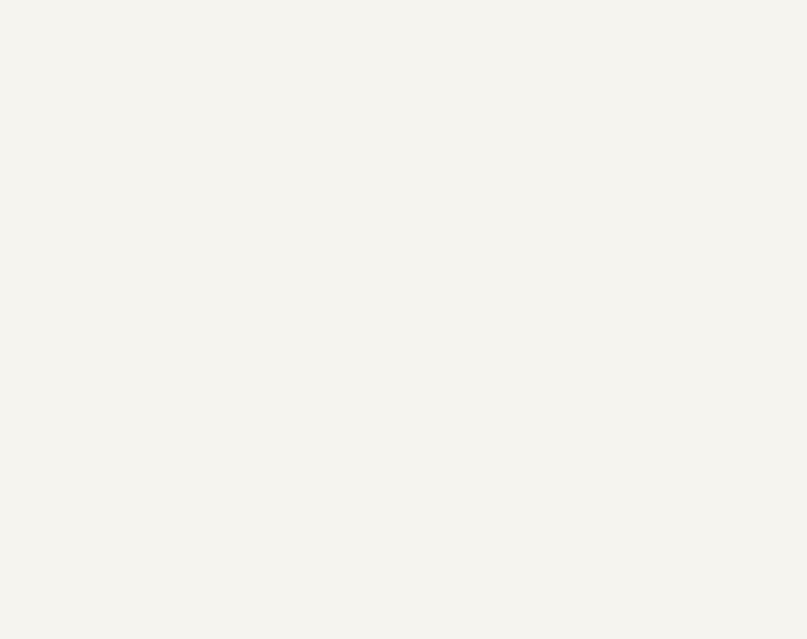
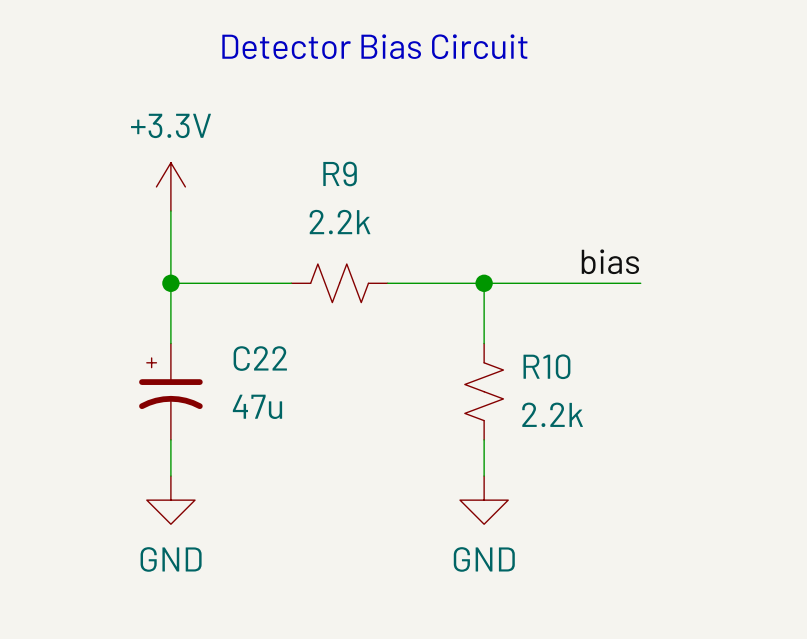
text: none -> Detector Bias Circuit (374, 46)
power symbol: none -> +3.3V (170, 186)
wire: none -> (170, 211) (170, 343)
label: none -> bias (610, 261)
wire: none -> (170, 283) (291, 283)
junction: none -> (170, 283)
R9: none -> 2.2k (339, 283)
wire: none -> (387, 283) (640, 283)
wire: none -> (484, 283) (484, 343)
junction: none -> (484, 283)
C22: none -> 47u (170, 391)
R10: none -> 2.2k (484, 391)
wire: none -> (170, 439) (170, 476)
wire: none -> (484, 439) (484, 476)
power symbol: none -> GND (170, 500)
power symbol: none -> GND (484, 500)

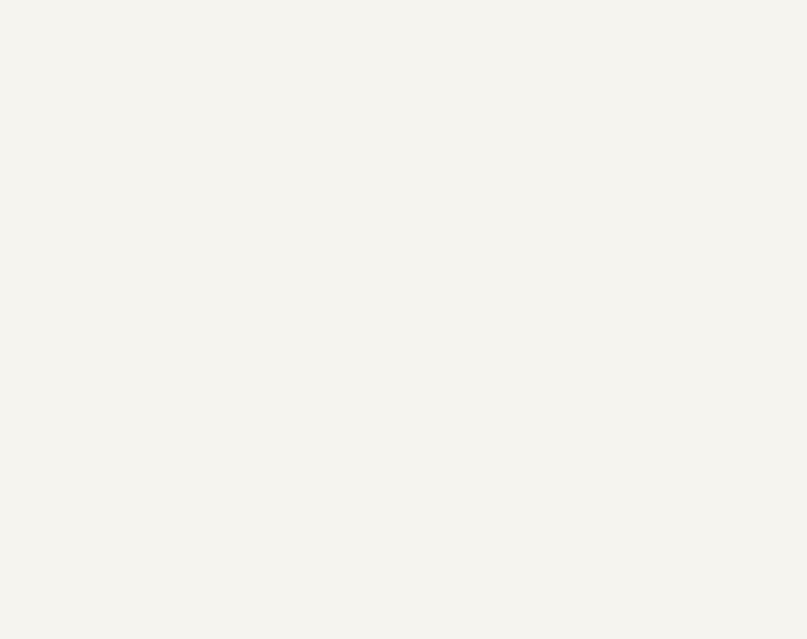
text: Detector Bias Circuit (374, 46) -> none
power symbol: +3.3V (170, 186) -> none
wire: (170, 211) (170, 343) -> none
label: bias (610, 261) -> none
wire: (170, 283) (291, 283) -> none
junction: (170, 283) -> none
R9: 2.2k (339, 283) -> none
wire: (387, 283) (640, 283) -> none
wire: (484, 283) (484, 343) -> none
junction: (484, 283) -> none
C22: 47u (170, 391) -> none
R10: 2.2k (484, 391) -> none
wire: (170, 439) (170, 476) -> none
wire: (484, 439) (484, 476) -> none
power symbol: GND (170, 500) -> none
power symbol: GND (484, 500) -> none

